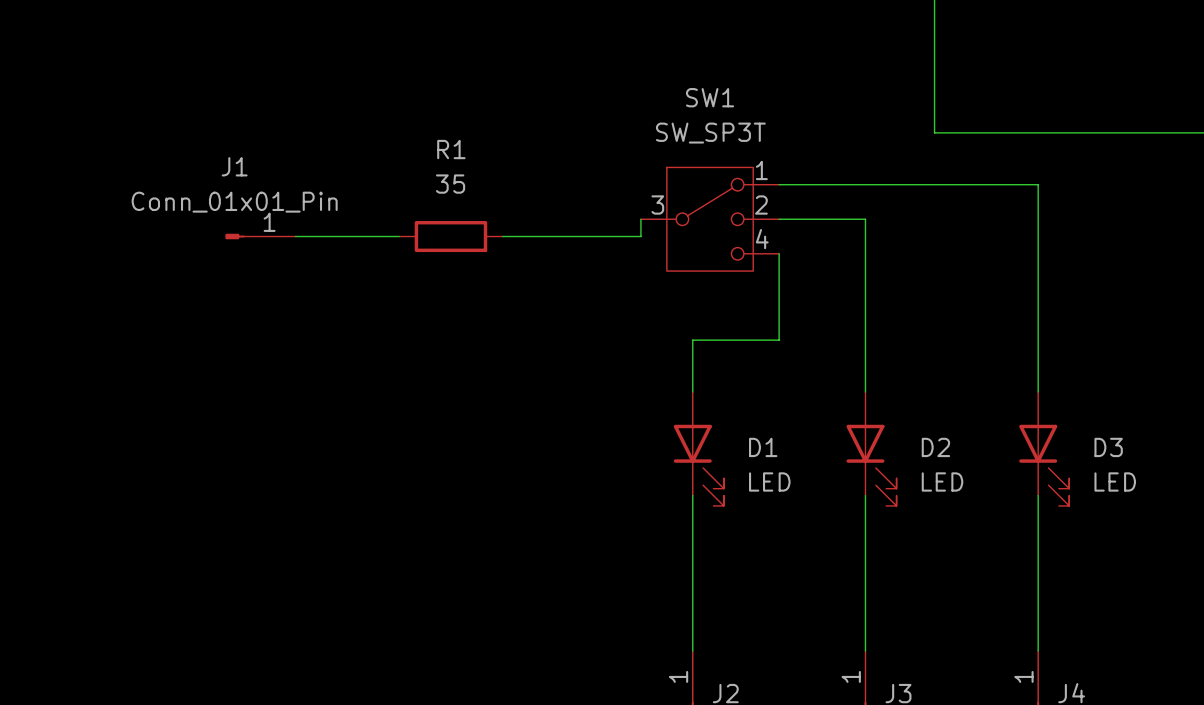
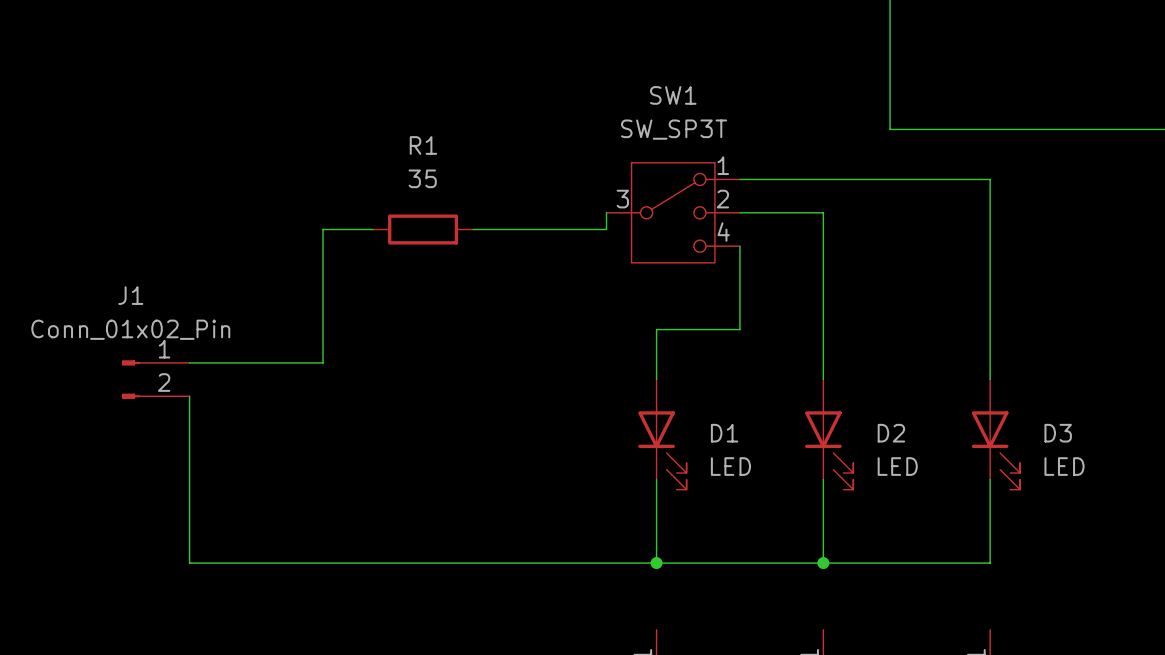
J1 value: Conn_01x01_Pin (234, 202) -> Conn_01x02_Pin (130, 329)
J1 symbol: [225, 233, 296, 240] -> [121, 360, 190, 399]
wire: (295, 236) (347, 236) -> (189, 362) (322, 362) (322, 229)
wire: (692, 581) (692, 651) -> none
junction: none -> (656, 563)
wire: (865, 581) (865, 651) -> none
junction: none -> (823, 563)
wire: (1038, 581) (1038, 651) -> (990, 563) (189, 563) (189, 396)

